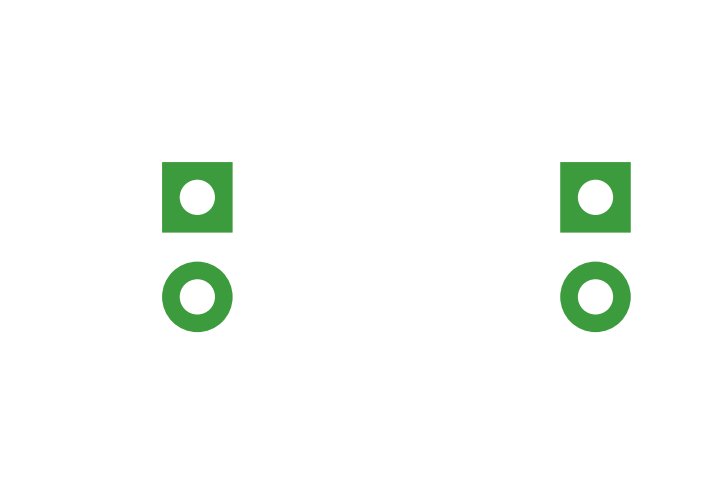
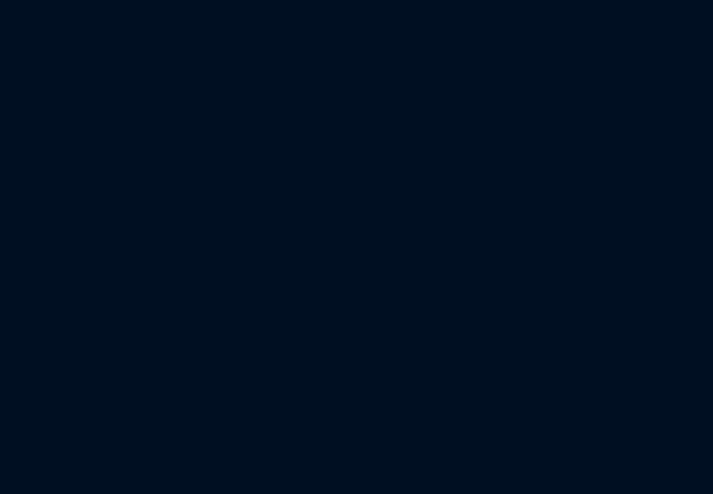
part: (197, 247) -> none
part: (595, 247) -> none

